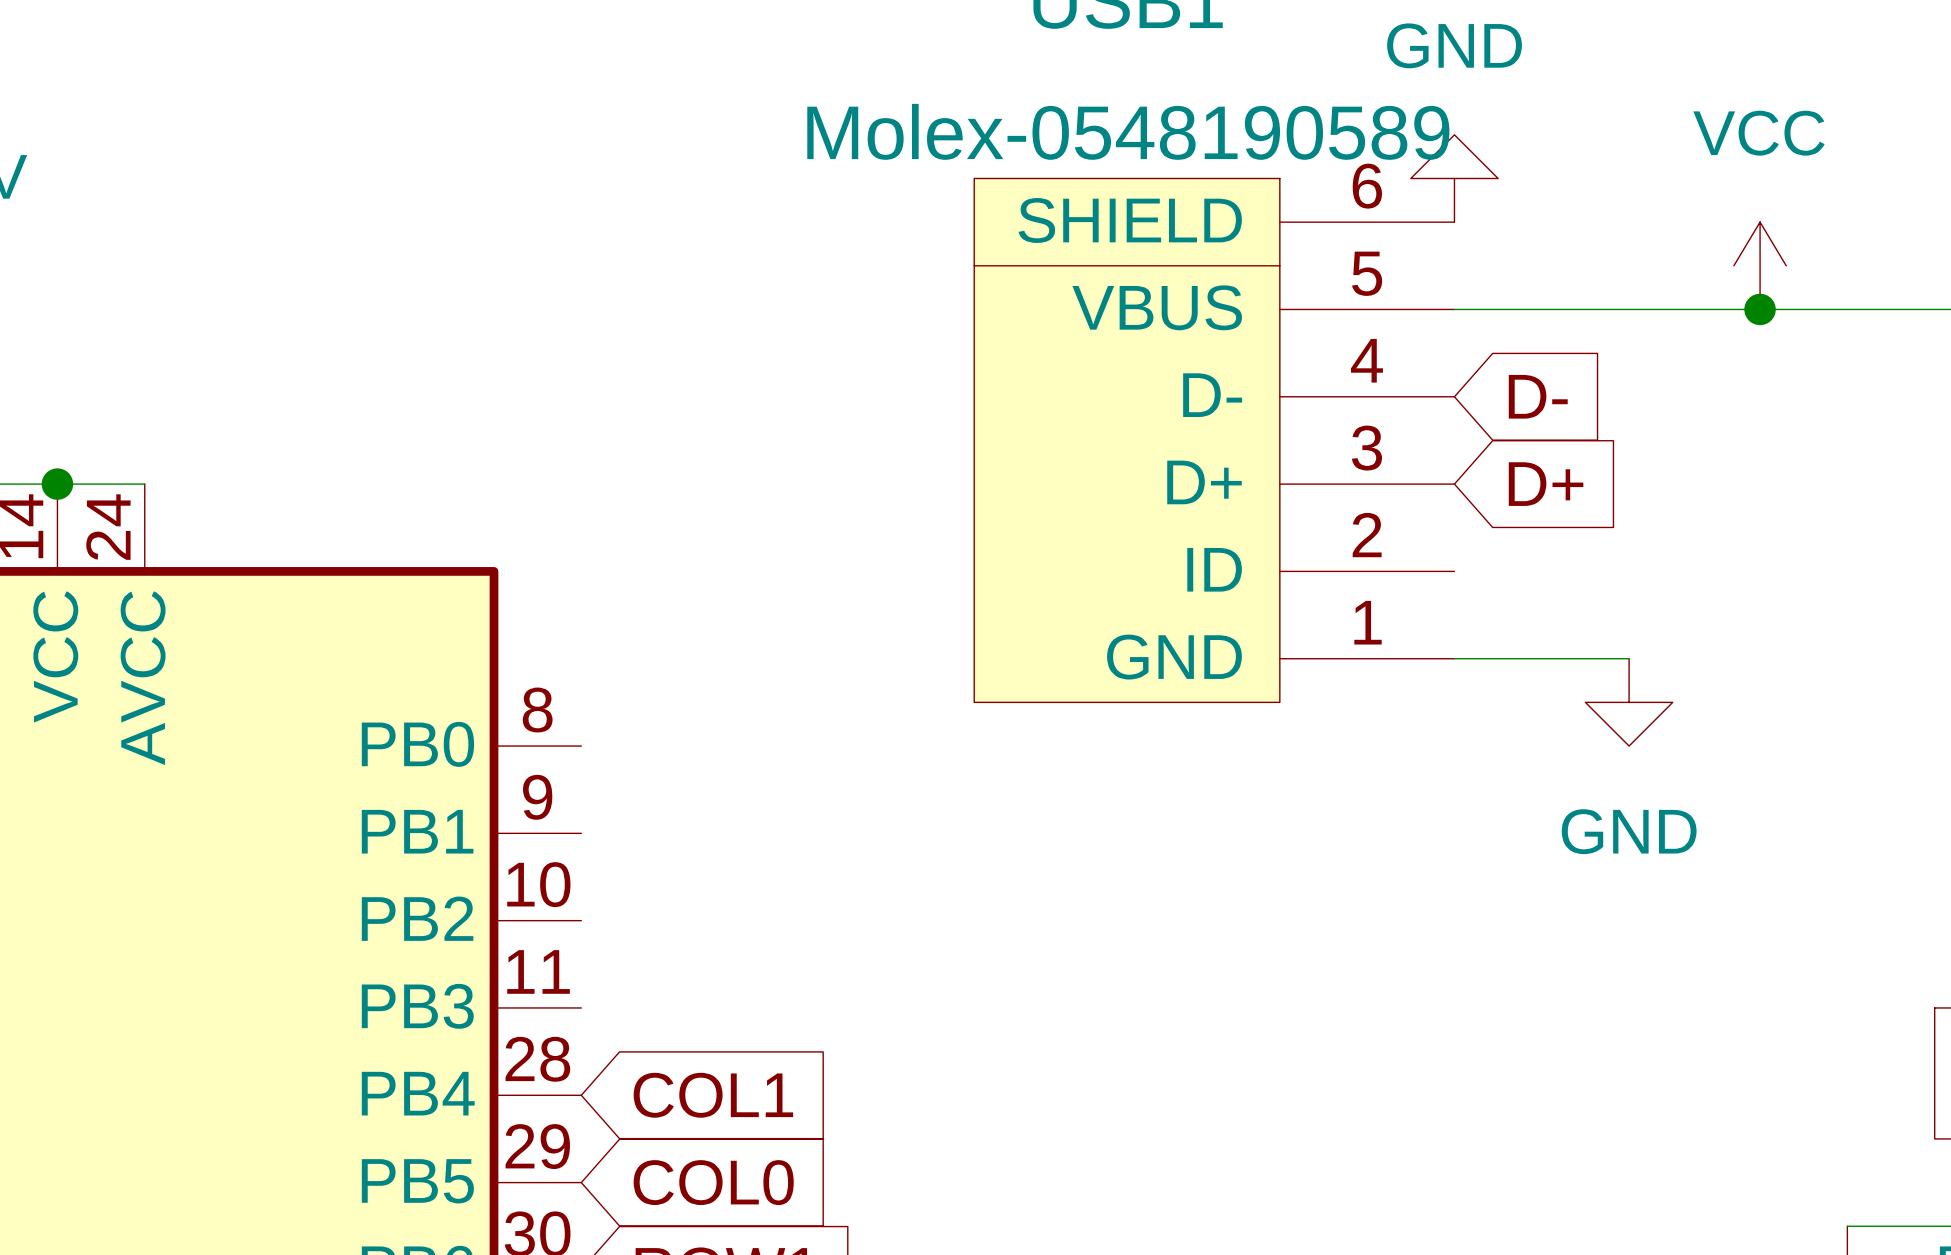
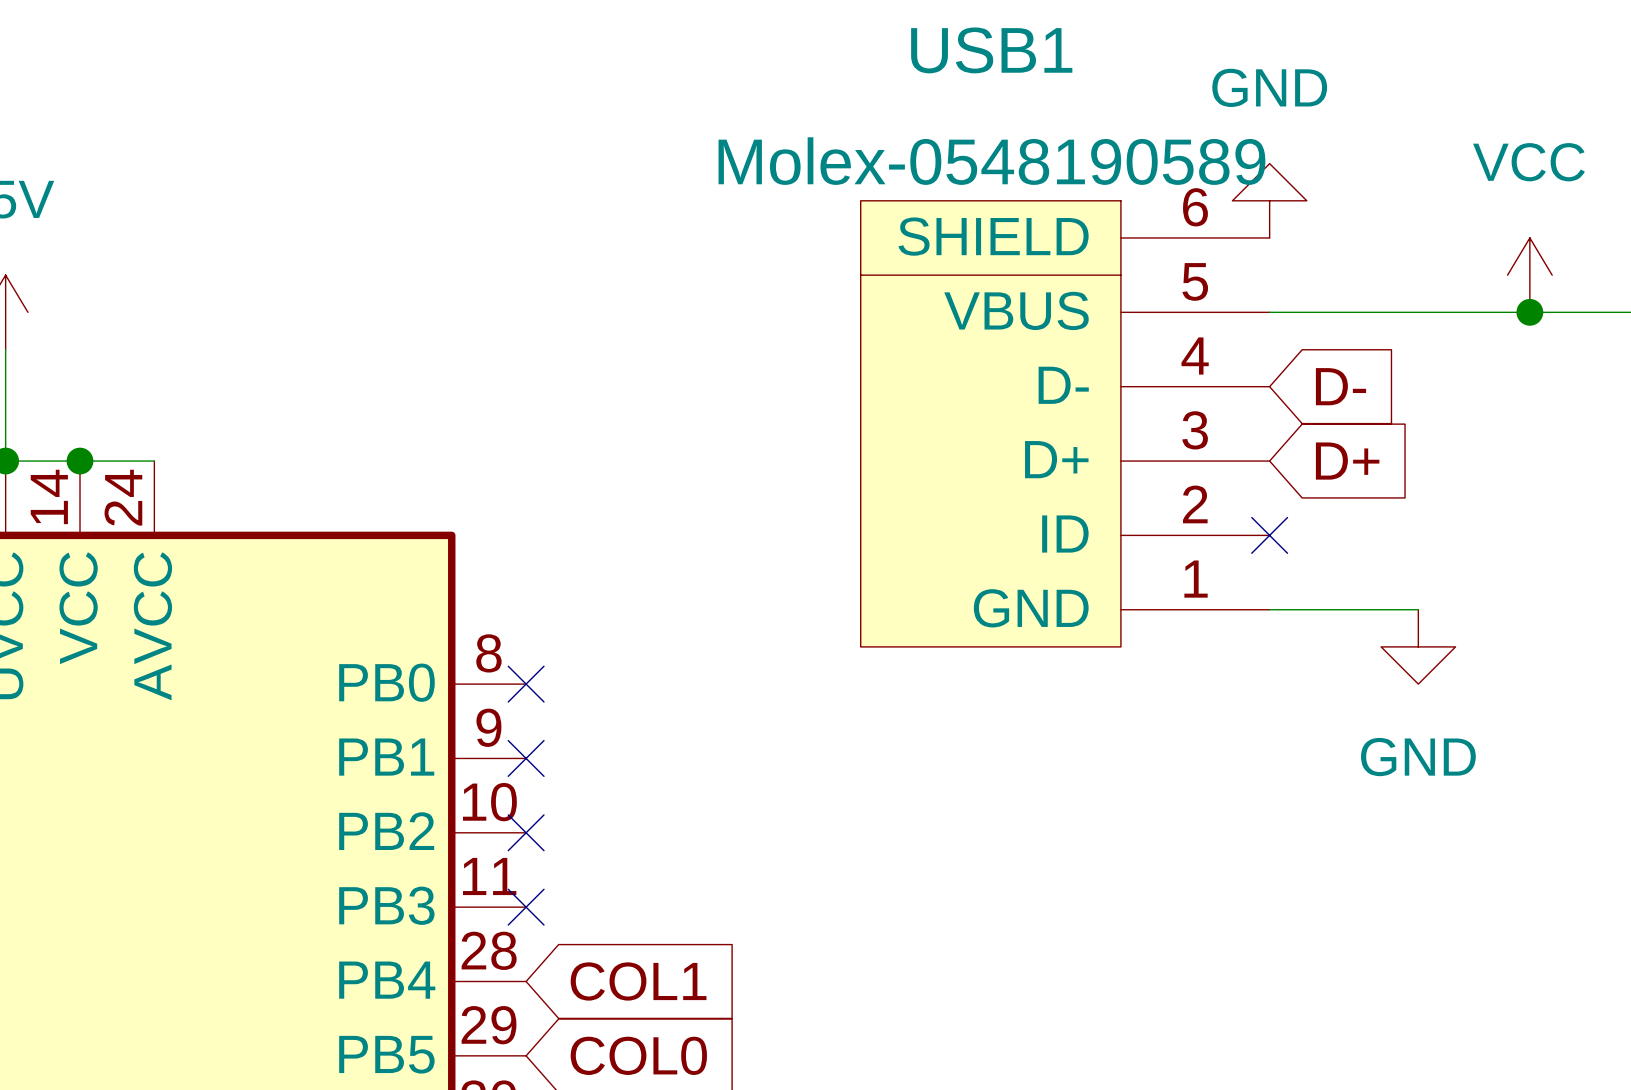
no-connect mark: none -> (1269, 535)
no-connect mark: none -> (526, 684)
no-connect mark: none -> (526, 758)
no-connect mark: none -> (526, 832)
no-connect mark: none -> (526, 907)

